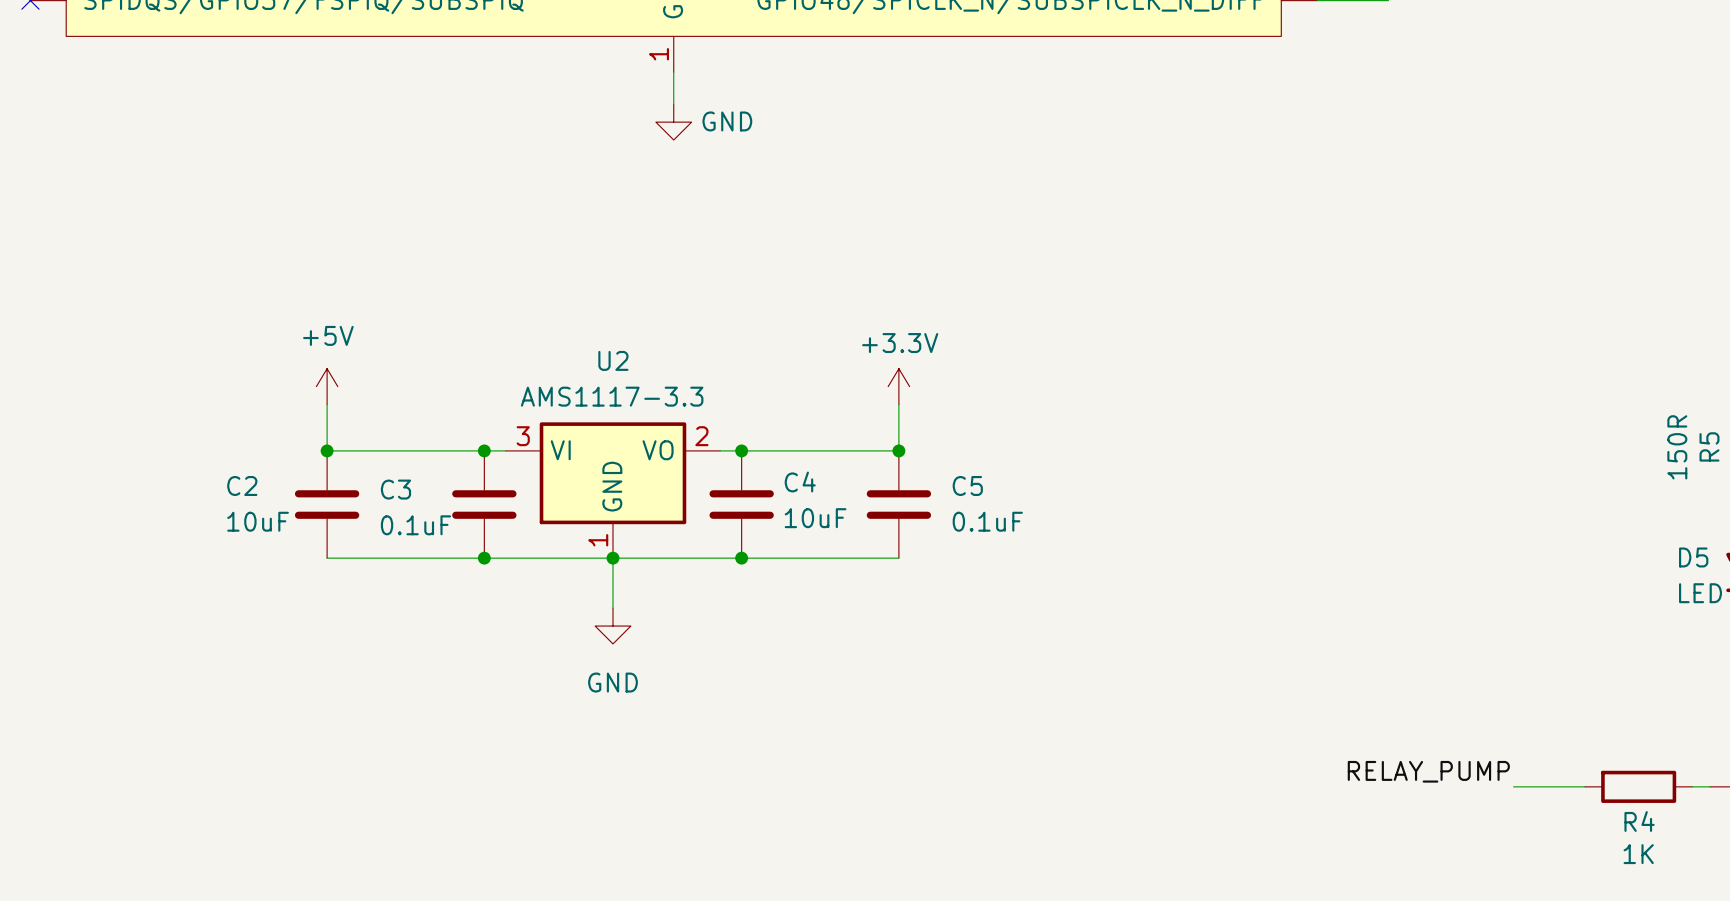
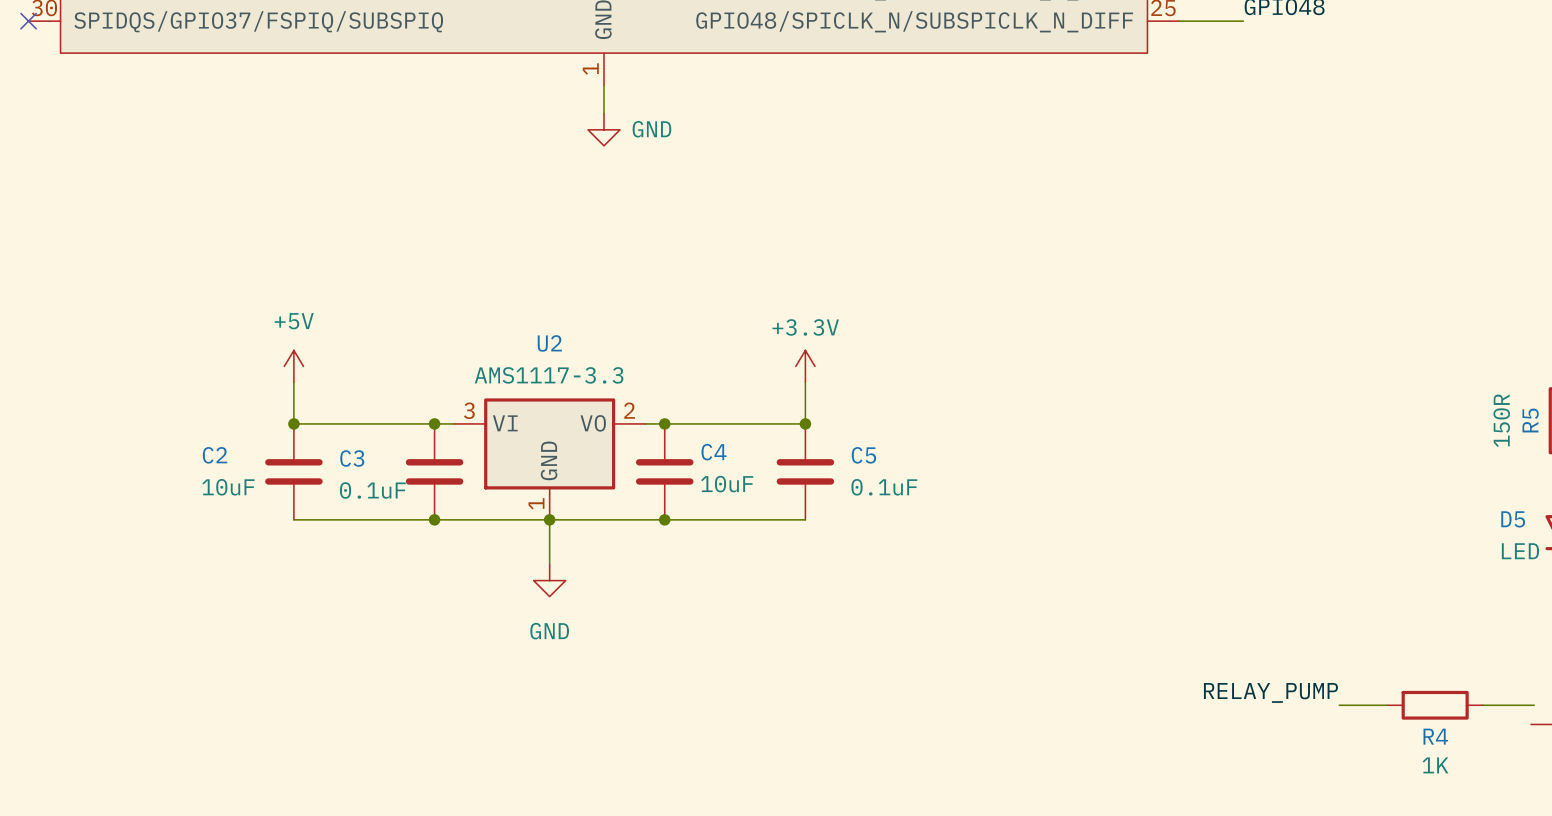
wire: none -> (1339, 705) (1387, 705)
wire: none -> (1483, 705) (1534, 705)
label position: RELAY_PUMP (1428, 771) -> RELAY_PUMP (1270, 692)
wire: (1513, 786) (1585, 786) -> none
R4 position: (1638, 786) -> (1435, 705)
wire: (1692, 786) (1710, 786) -> none

